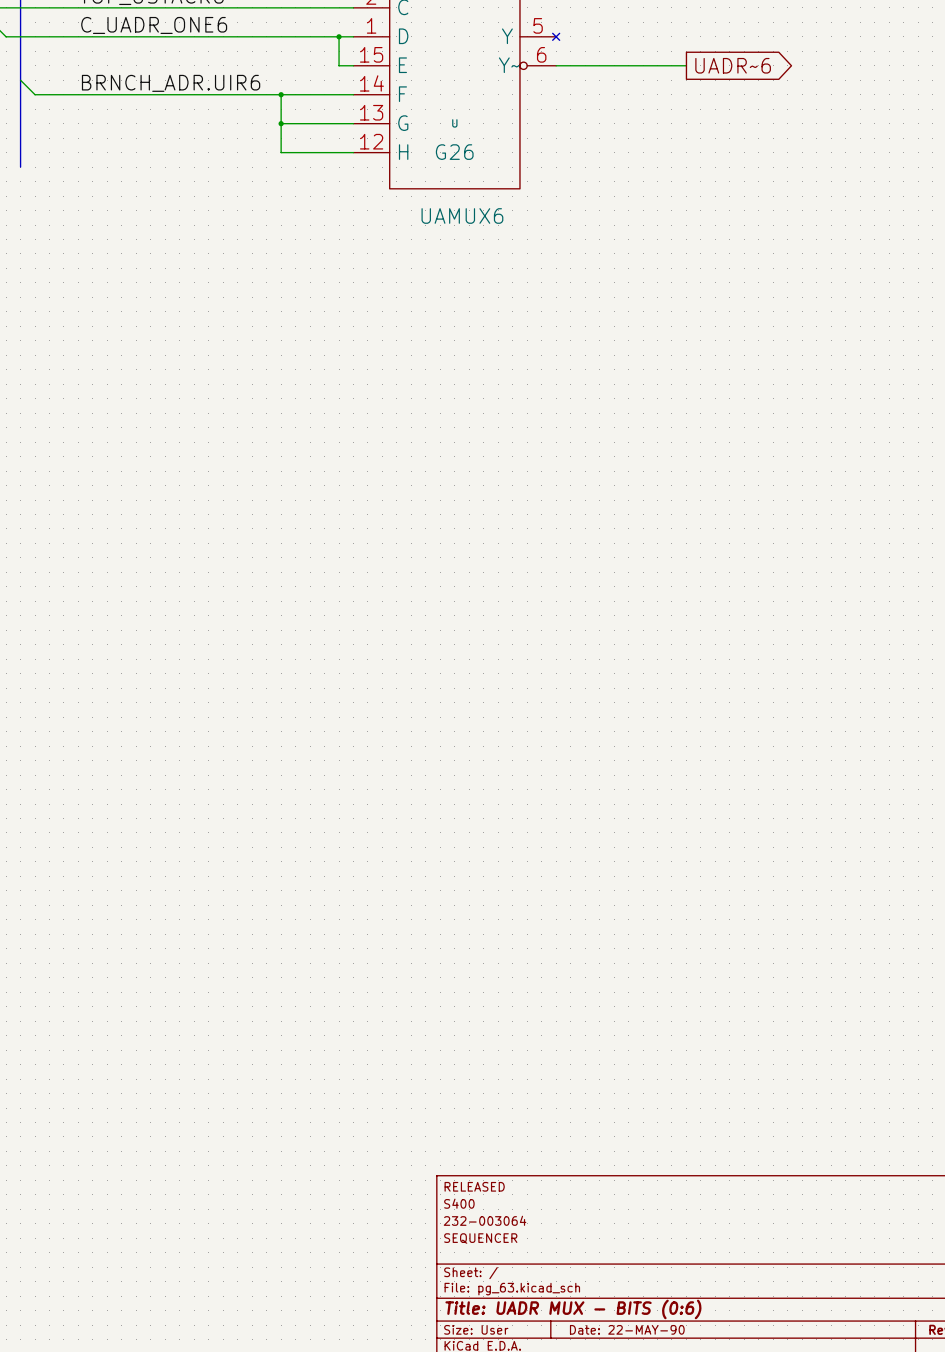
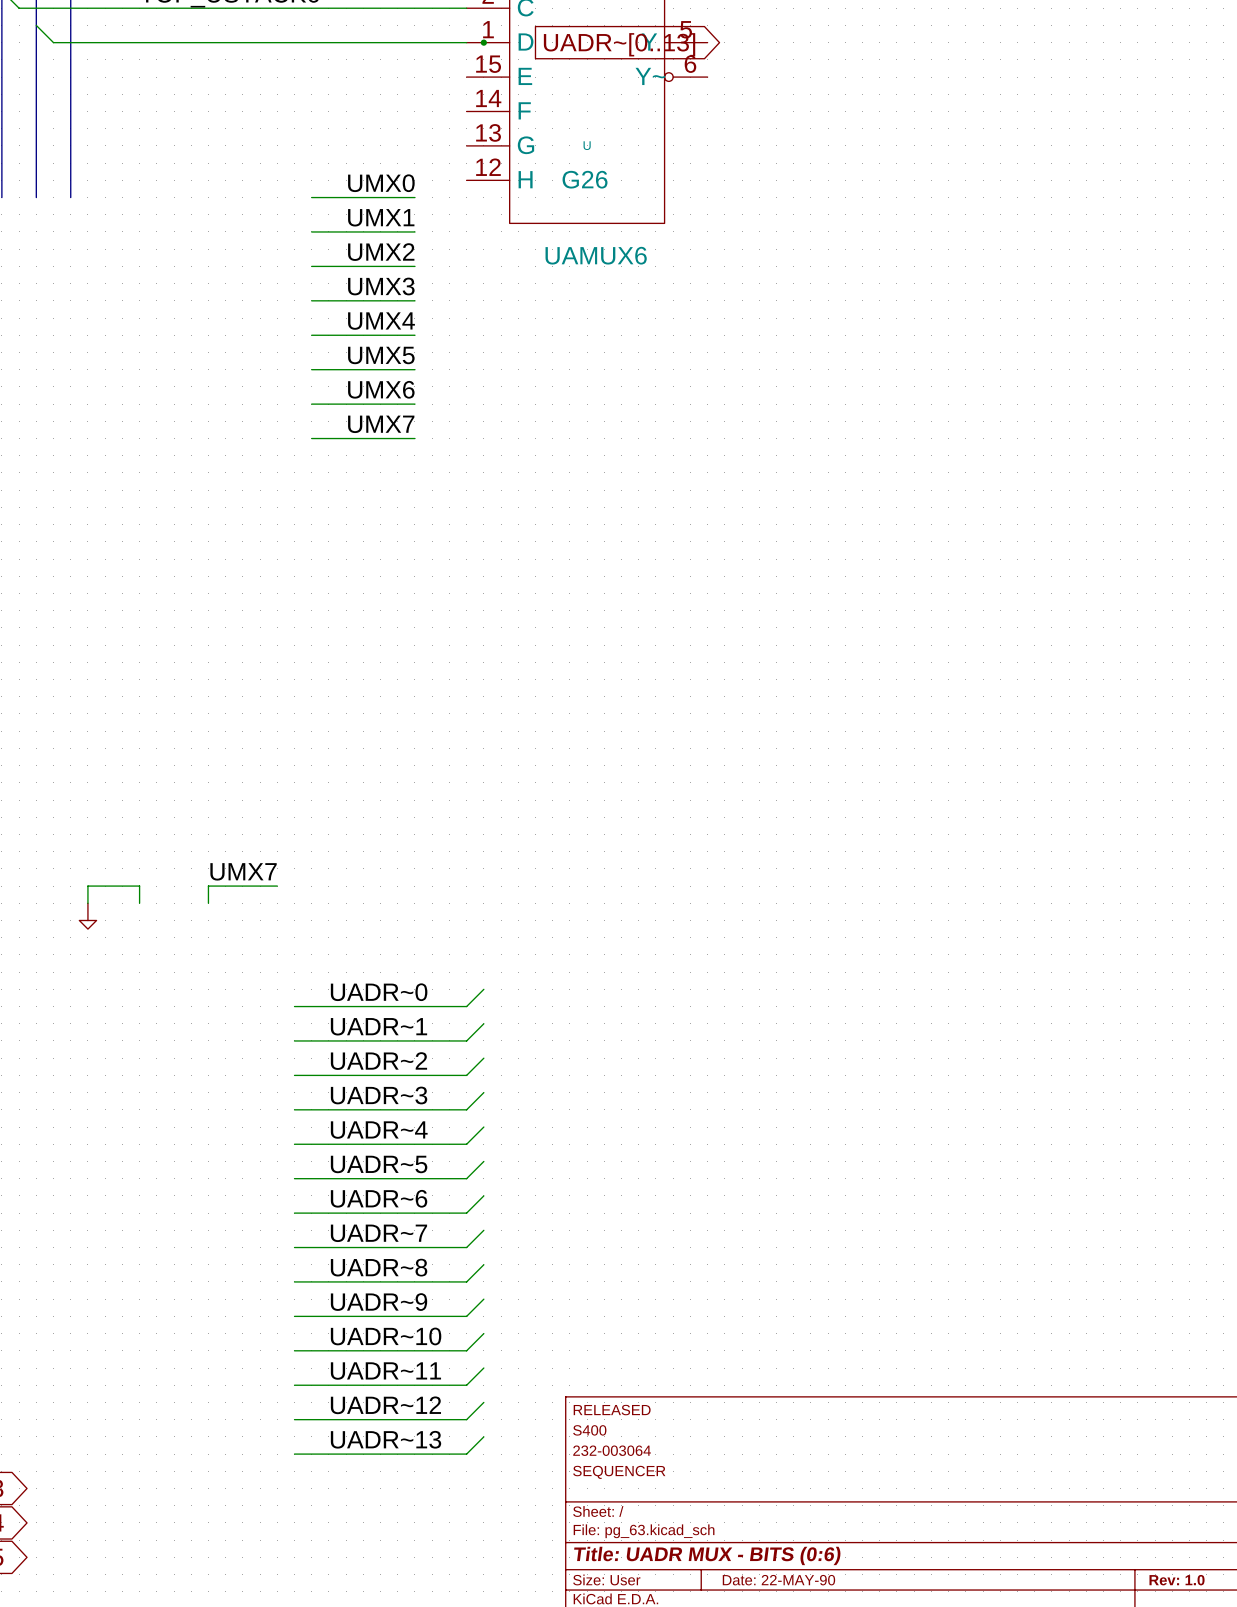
label: C_UADR_ONE6 (154, 25) -> none
wire: (339, 36) (339, 65) (353, 65) -> none
junction position: (339, 36) -> (483, 42)
no-connect mark: (556, 36) -> none
global label: none -> UADR~[0..13] (619, 44)
wire: (556, 65) (686, 65) -> none
global label: UADR~6 (733, 65) -> none
wire: (20, 80) (35, 94) (353, 94) -> none
label: BRNCH_ADR.UIR6 (171, 83) -> none
wire: (281, 94) (281, 152) (353, 152) -> none
junction: (281, 94) -> none
wire: (281, 123) (353, 123) -> none
junction: (281, 123) -> none
label: none -> UMX0 (381, 183)
wire: none -> (311, 197) (414, 197)
label: none -> UMX1 (381, 217)
wire: none -> (311, 231) (414, 231)
label: none -> UMX2 (381, 252)
wire: none -> (311, 266) (414, 266)
label: none -> UMX3 (381, 286)
wire: none -> (311, 300) (414, 300)
label: none -> UMX4 (381, 321)
wire: none -> (311, 335) (414, 335)
label: none -> UMX5 (381, 355)
wire: none -> (311, 369) (414, 369)
label: none -> UMX6 (381, 389)
wire: none -> (311, 404) (414, 404)
label: none -> UMX7 (381, 424)
wire: none -> (311, 438) (414, 438)
label: none -> UMX7 (243, 871)
wire: none -> (277, 886) (208, 886) (208, 903)
wire: none -> (87, 903) (87, 886) (139, 886) (139, 903)
power symbol: none -> (87, 916)
wire: none -> (483, 989) (466, 1006) (294, 1006)
label: none -> UADR~0 (379, 992)
wire: none -> (483, 1023) (466, 1040) (294, 1040)
label: none -> UADR~1 (378, 1026)
wire: none -> (483, 1058) (466, 1075) (294, 1075)
label: none -> UADR~2 (378, 1061)
wire: none -> (483, 1092) (466, 1109) (294, 1109)
label: none -> UADR~3 (379, 1095)
wire: none -> (483, 1127) (466, 1144) (294, 1144)
label: none -> UADR~4 (379, 1130)
wire: none -> (483, 1161) (466, 1178) (294, 1178)
label: none -> UADR~5 (379, 1164)
wire: none -> (483, 1195) (466, 1213) (294, 1213)
label: none -> UADR~6 (379, 1198)
wire: none -> (483, 1230) (466, 1247) (294, 1247)
label: none -> UADR~7 (378, 1233)
wire: none -> (483, 1264) (466, 1281) (294, 1281)
label: none -> UADR~8 (379, 1267)
wire: none -> (483, 1299) (466, 1316) (294, 1316)
label: none -> UADR~9 (379, 1302)
wire: none -> (483, 1333) (466, 1350) (294, 1350)
label: none -> UADR~10 (386, 1336)
wire: none -> (483, 1368) (466, 1385) (294, 1385)
label: none -> UADR~11 (385, 1371)
wire: none -> (483, 1402) (466, 1419) (294, 1419)
label: none -> UADR~12 (385, 1405)
wire: none -> (483, 1436) (466, 1454) (294, 1454)
label: none -> UADR~13 (386, 1439)

